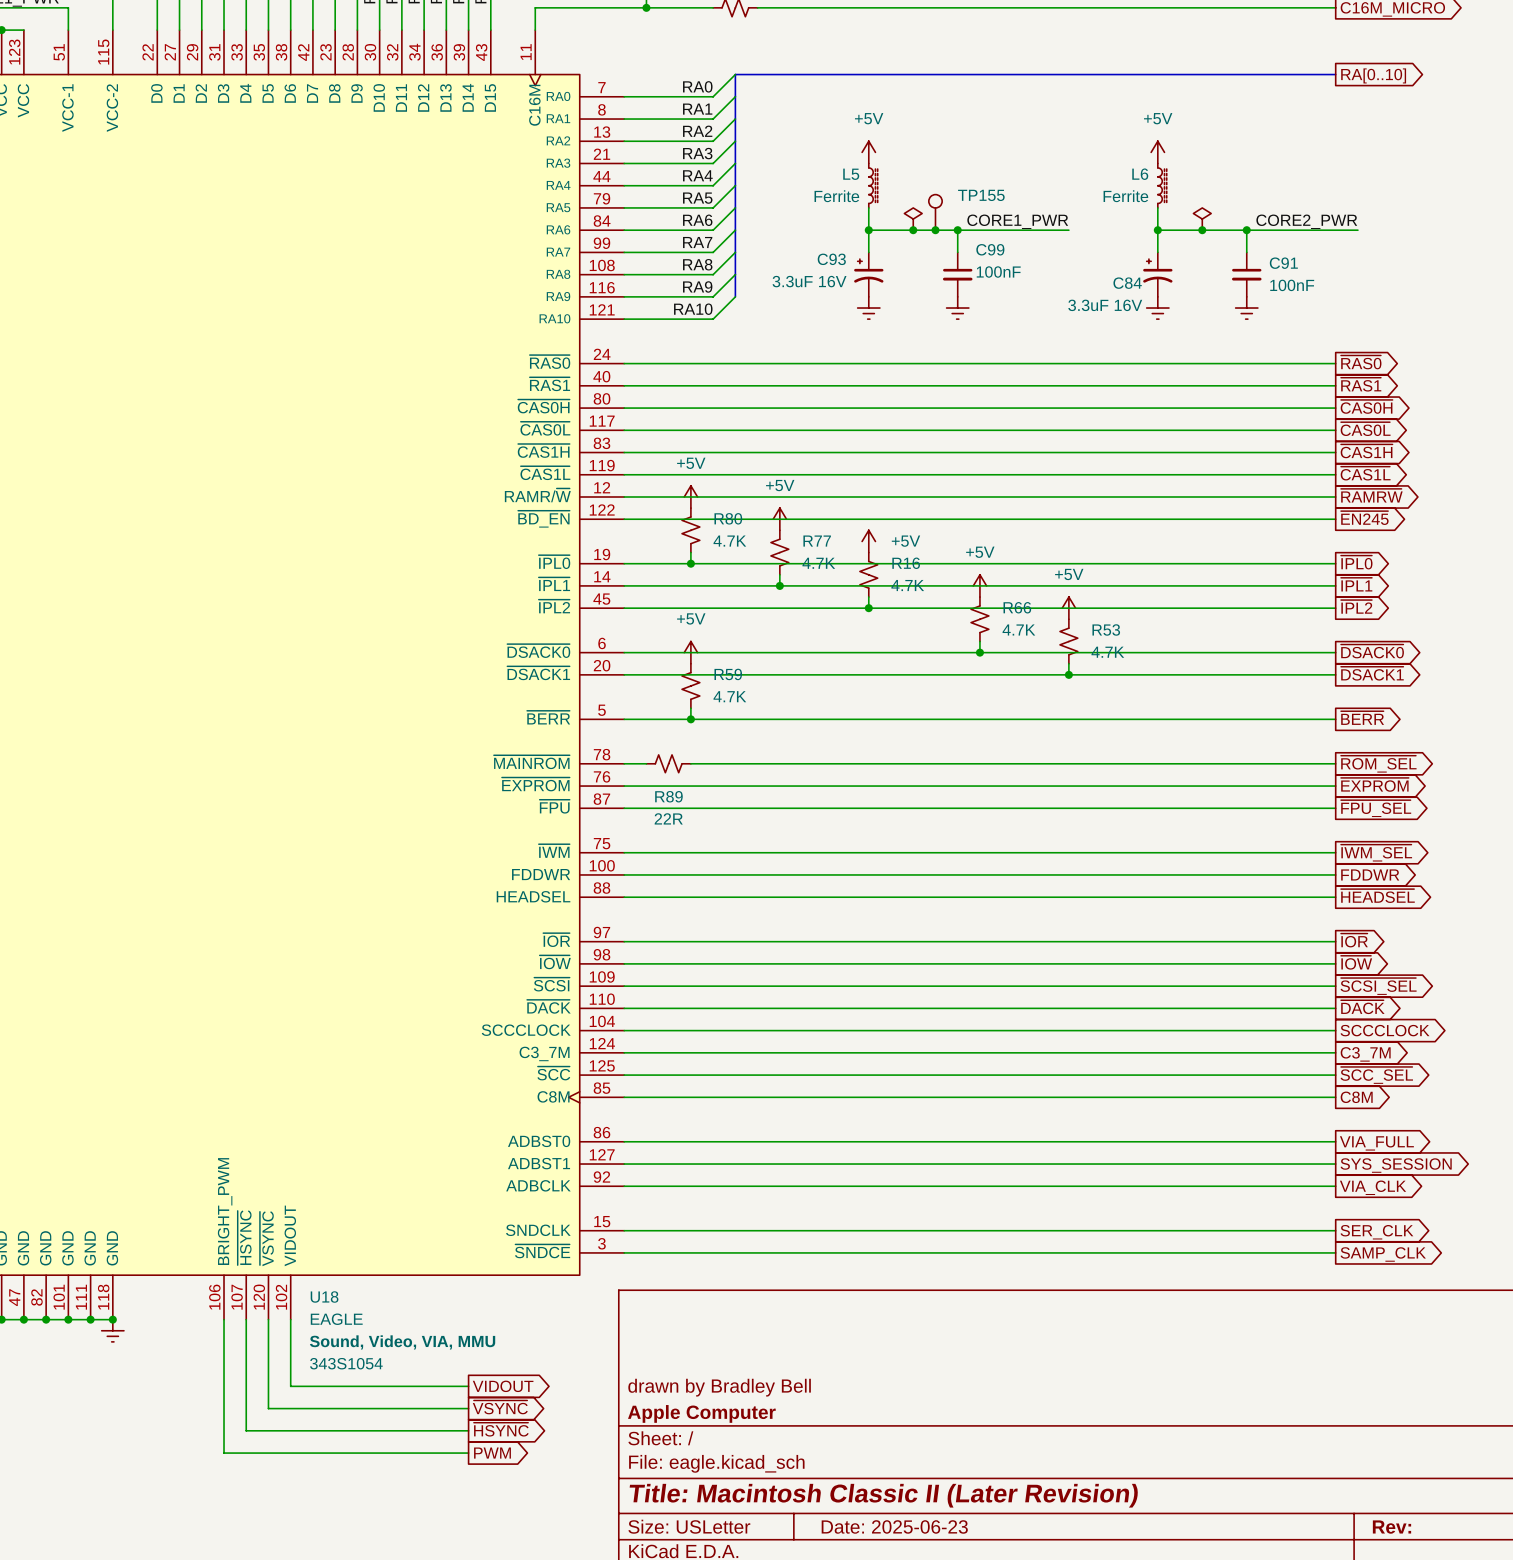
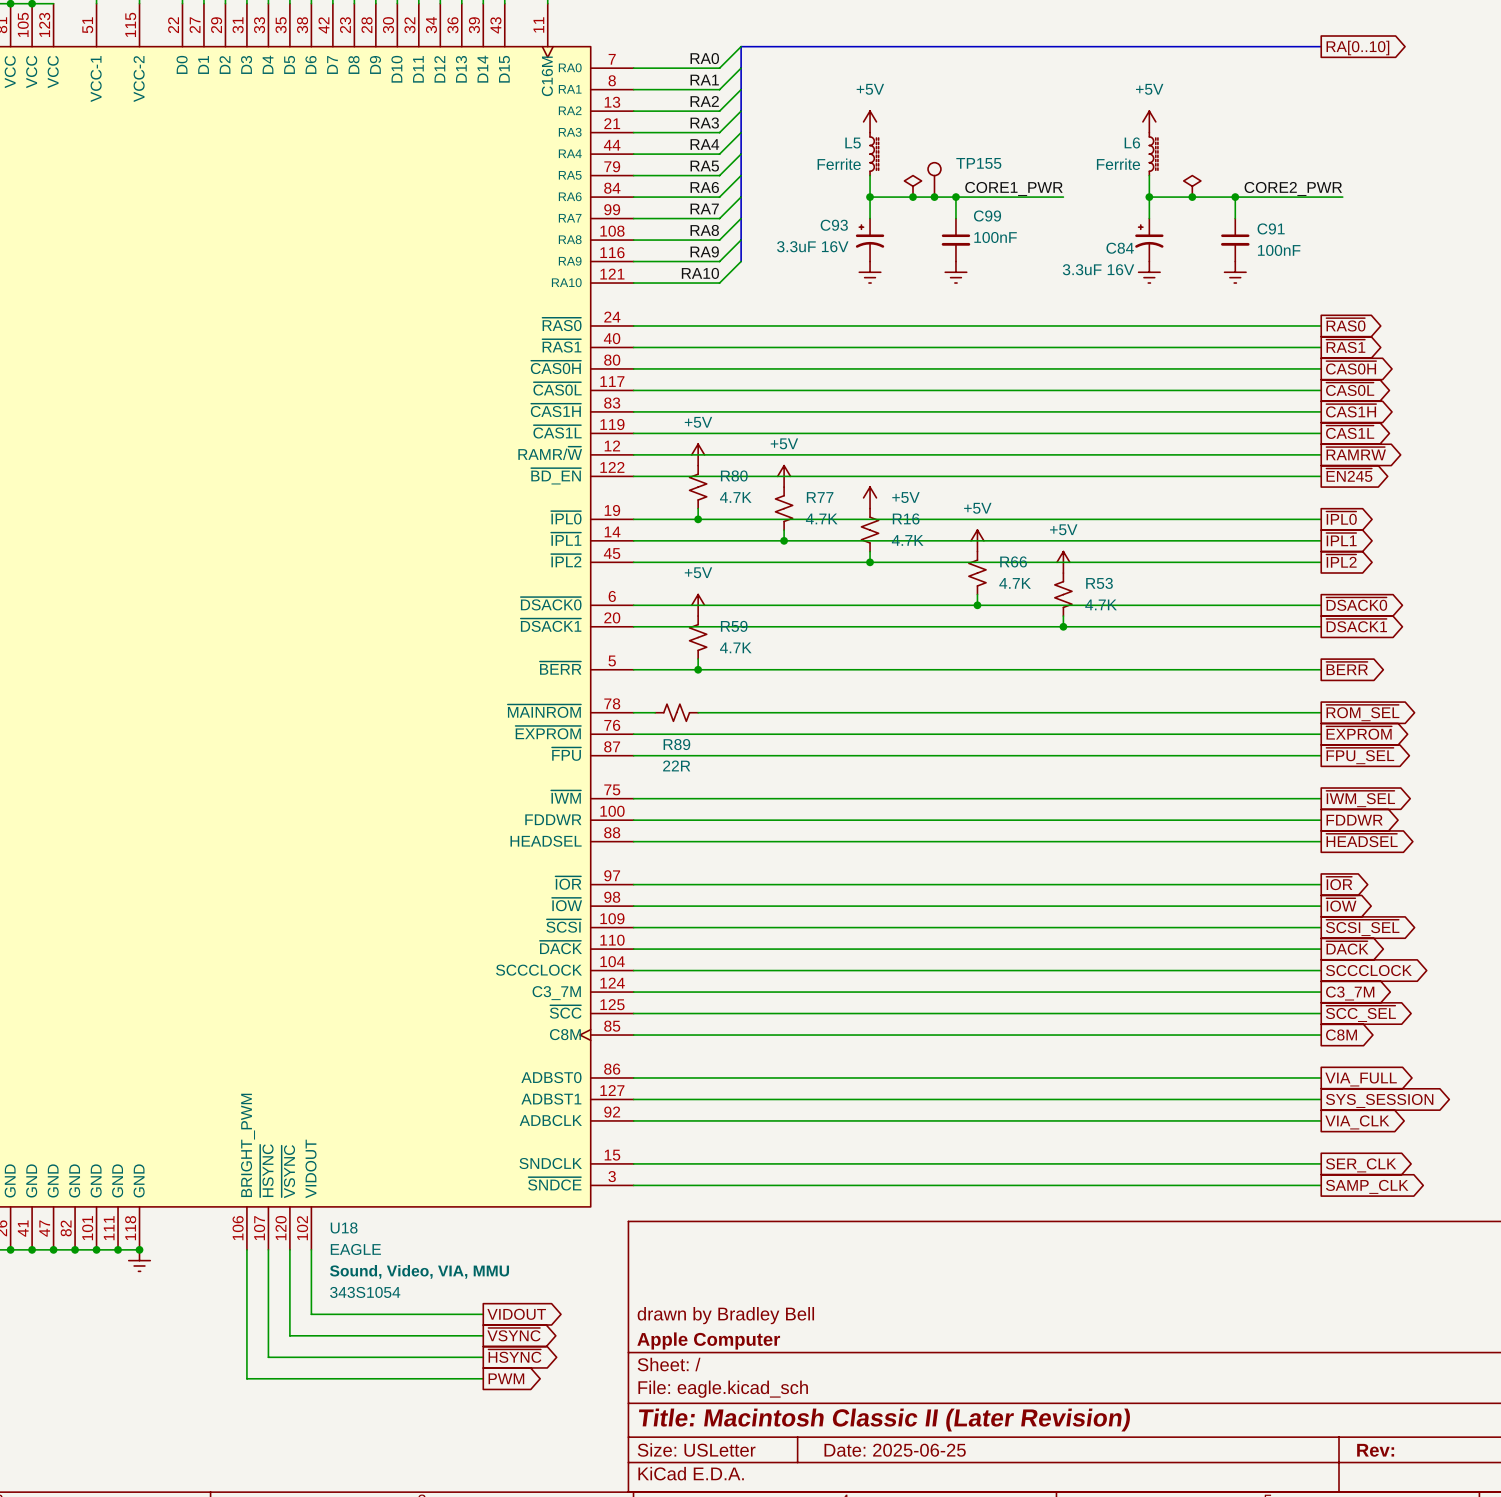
title block: Date: 2025-06-23 (894, 1526) -> Date: 2025-06-25 (895, 1450)

